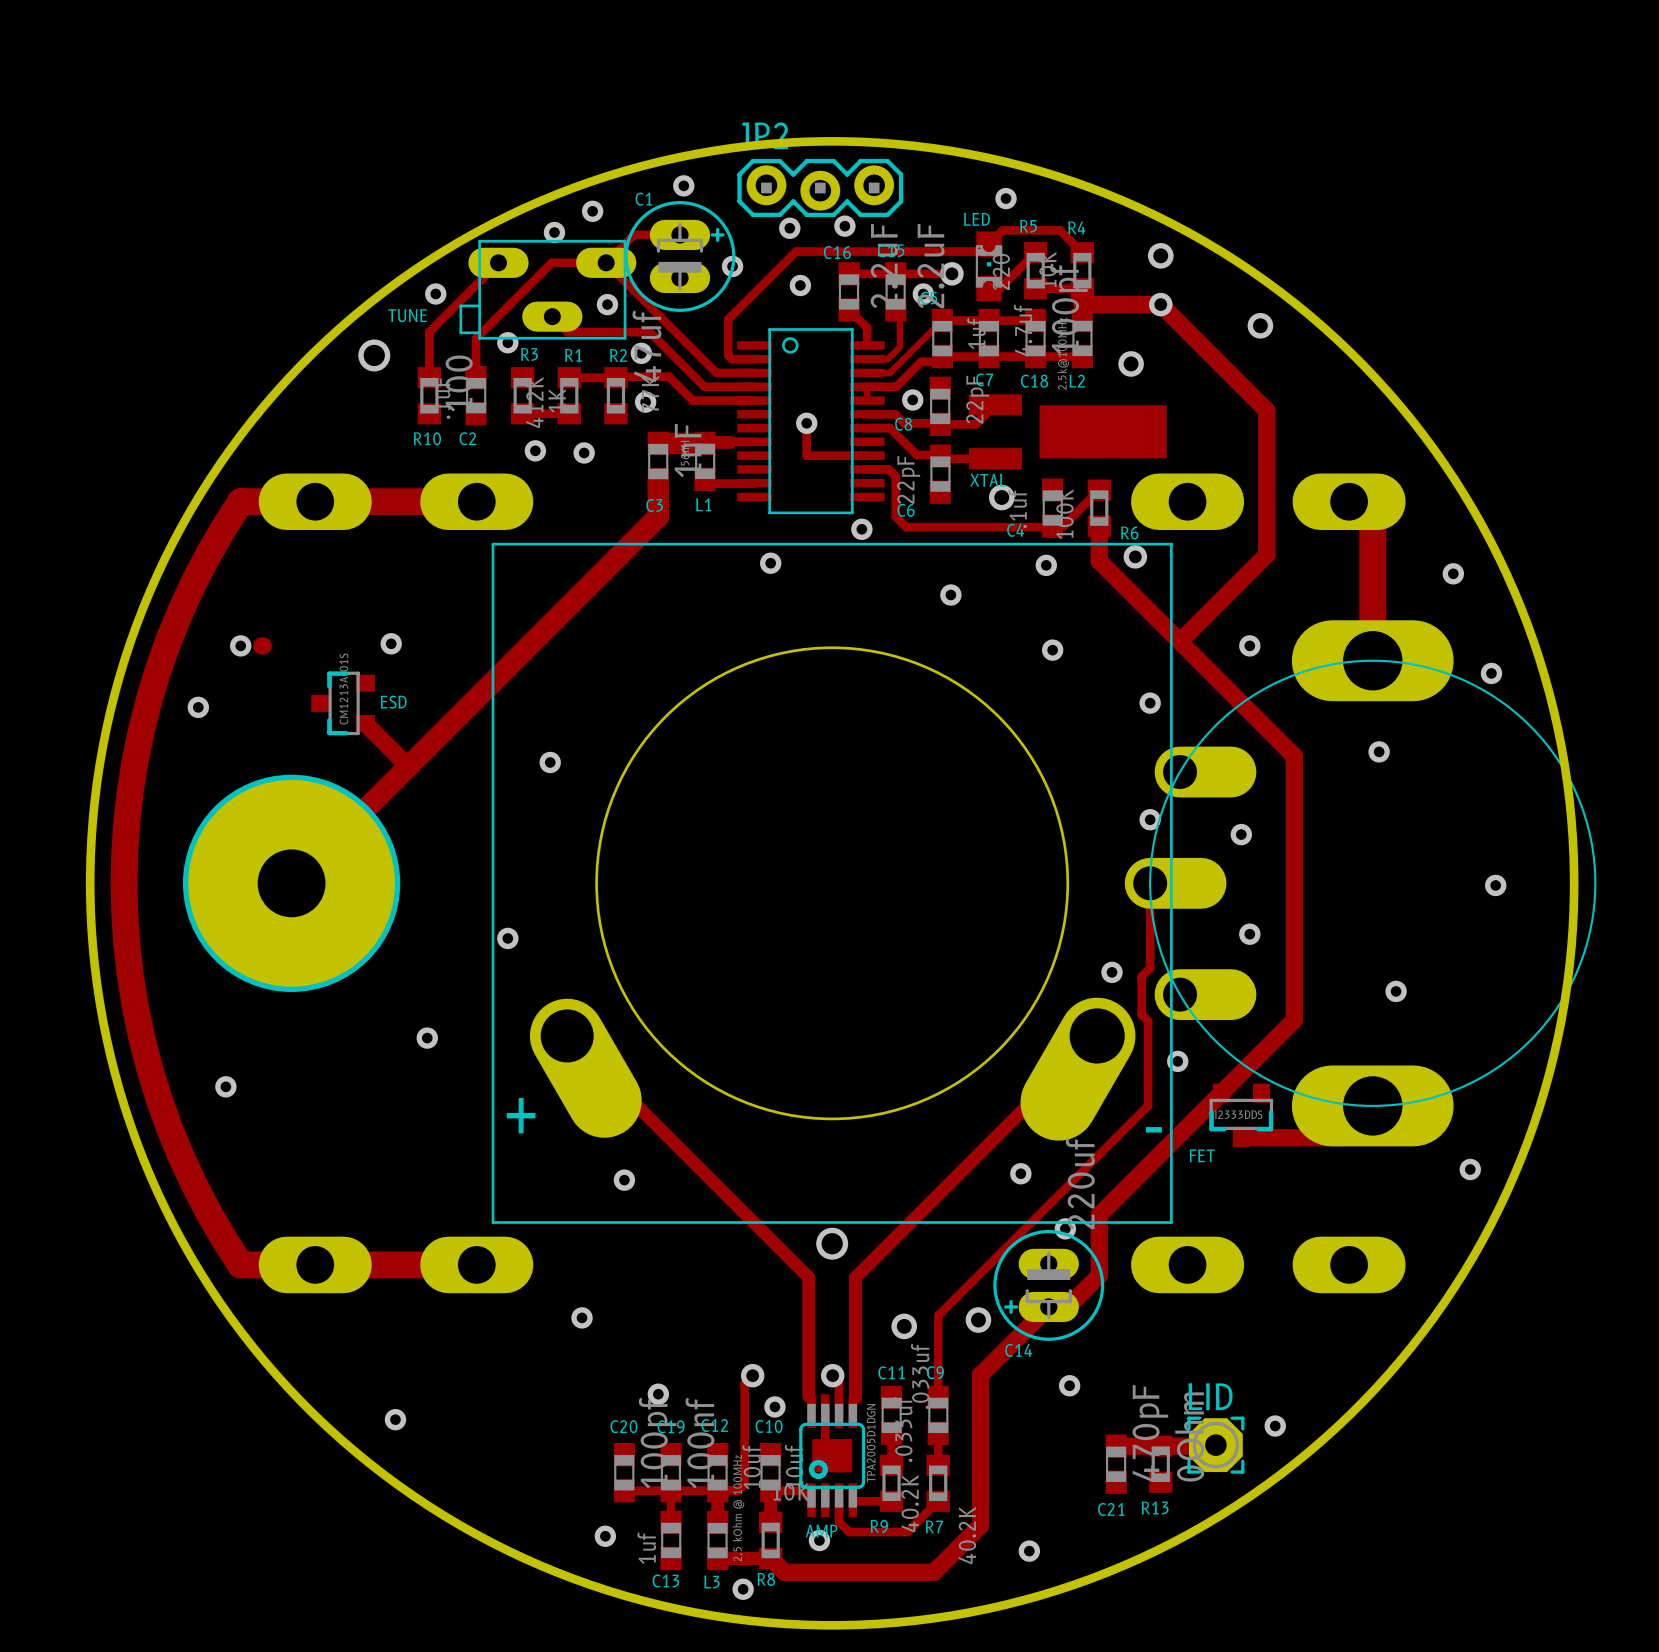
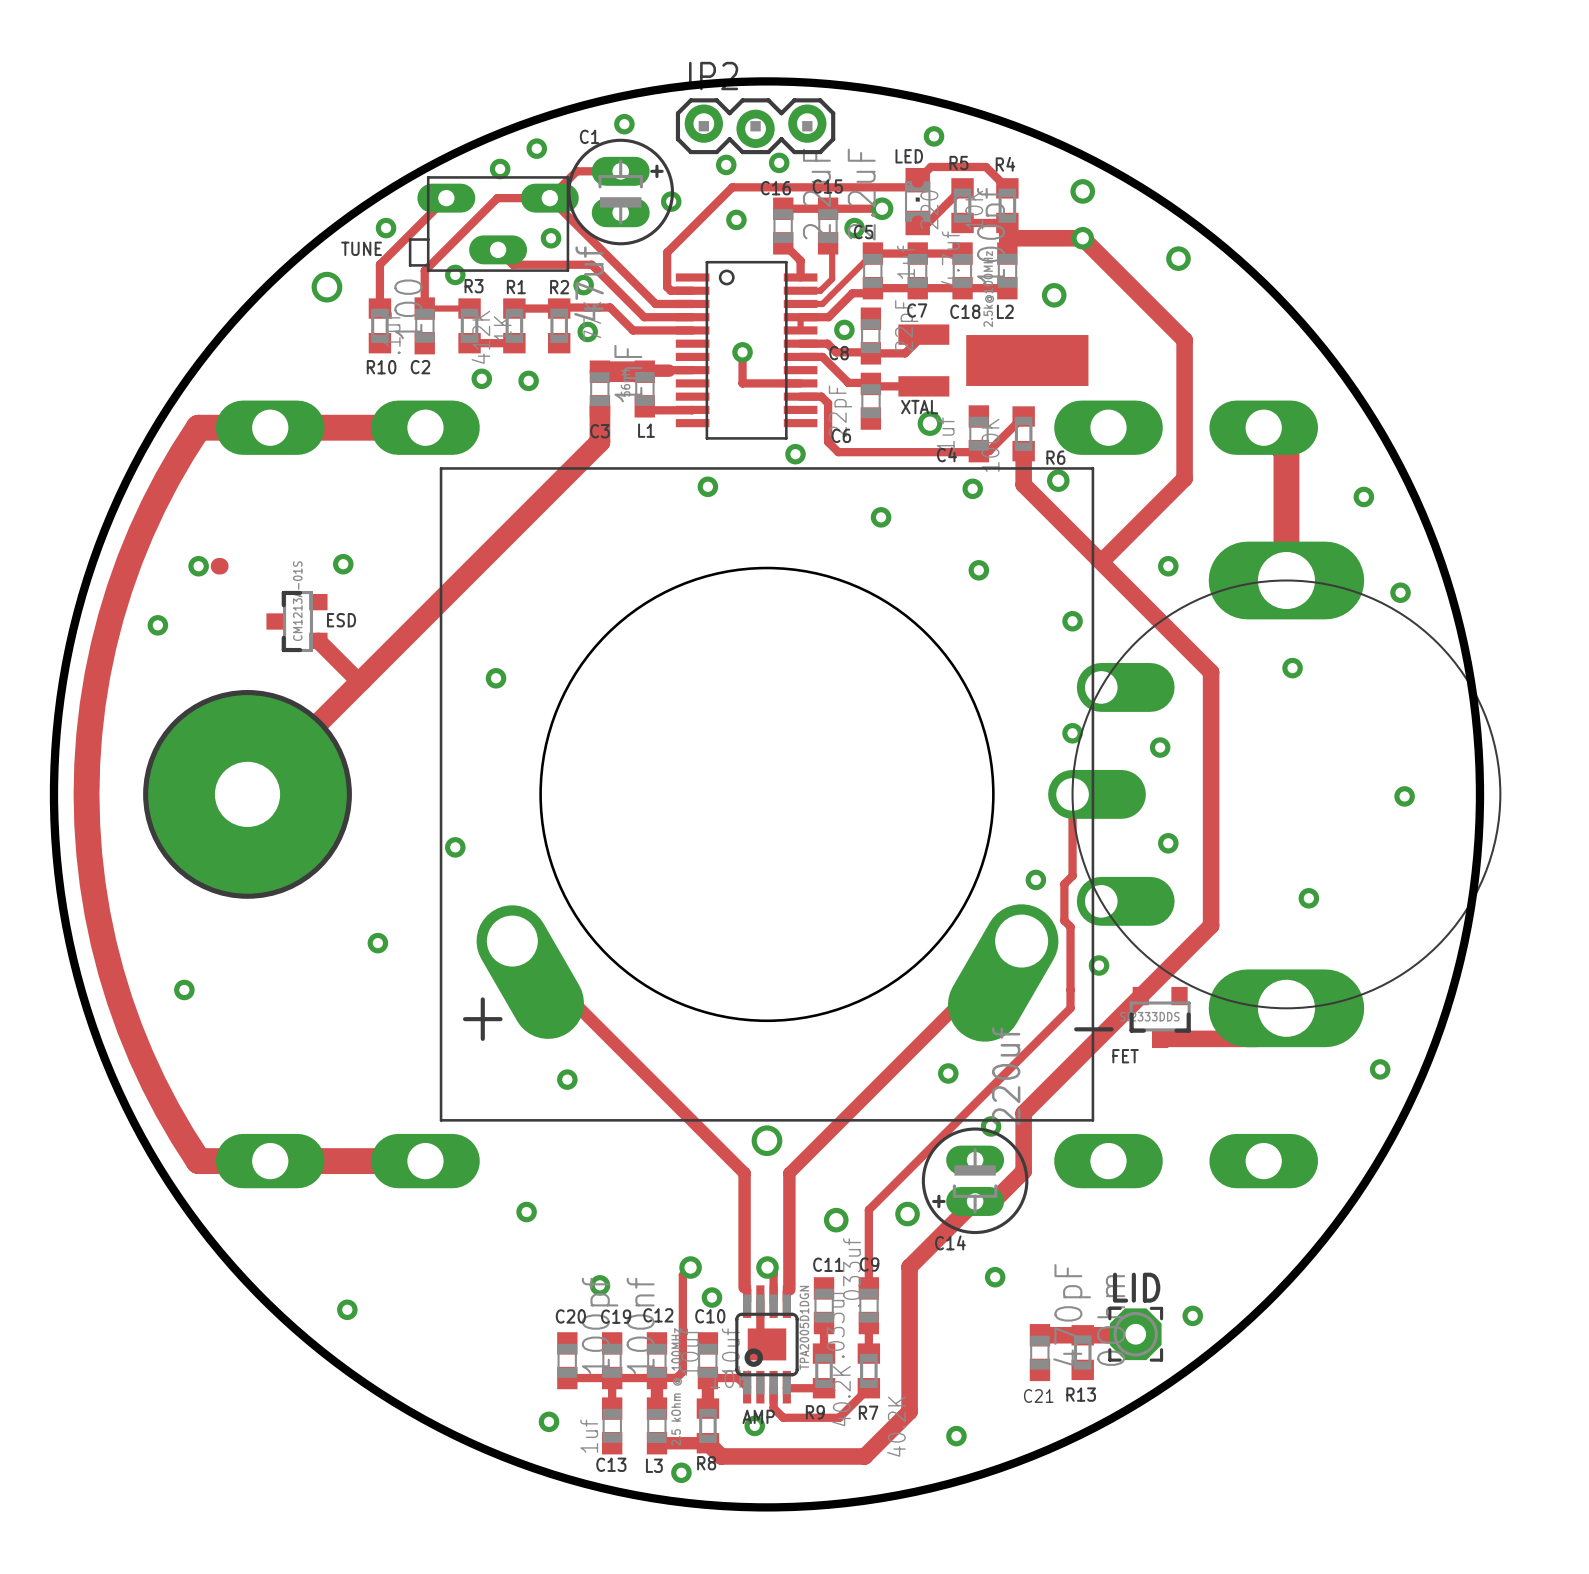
track: none -> (424, 308) (469, 308)

